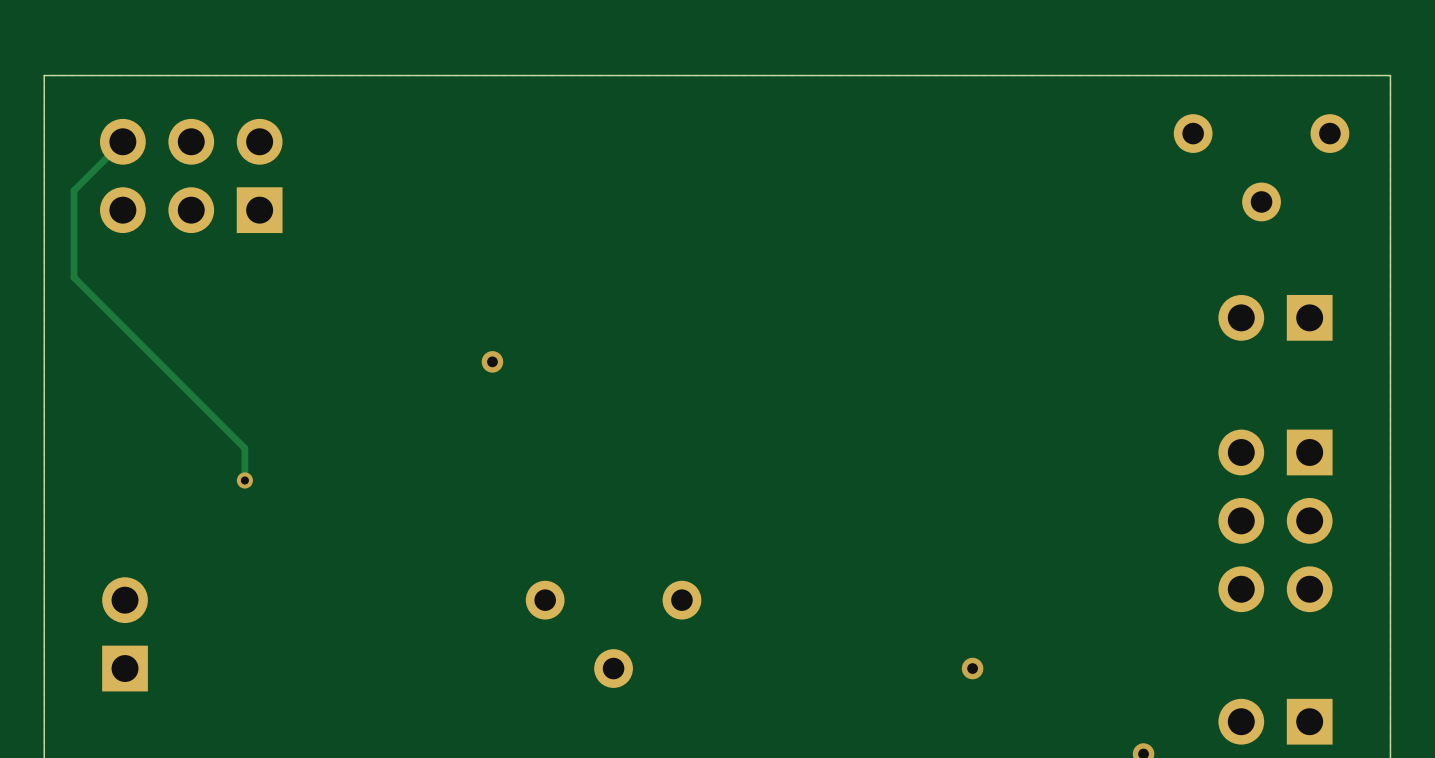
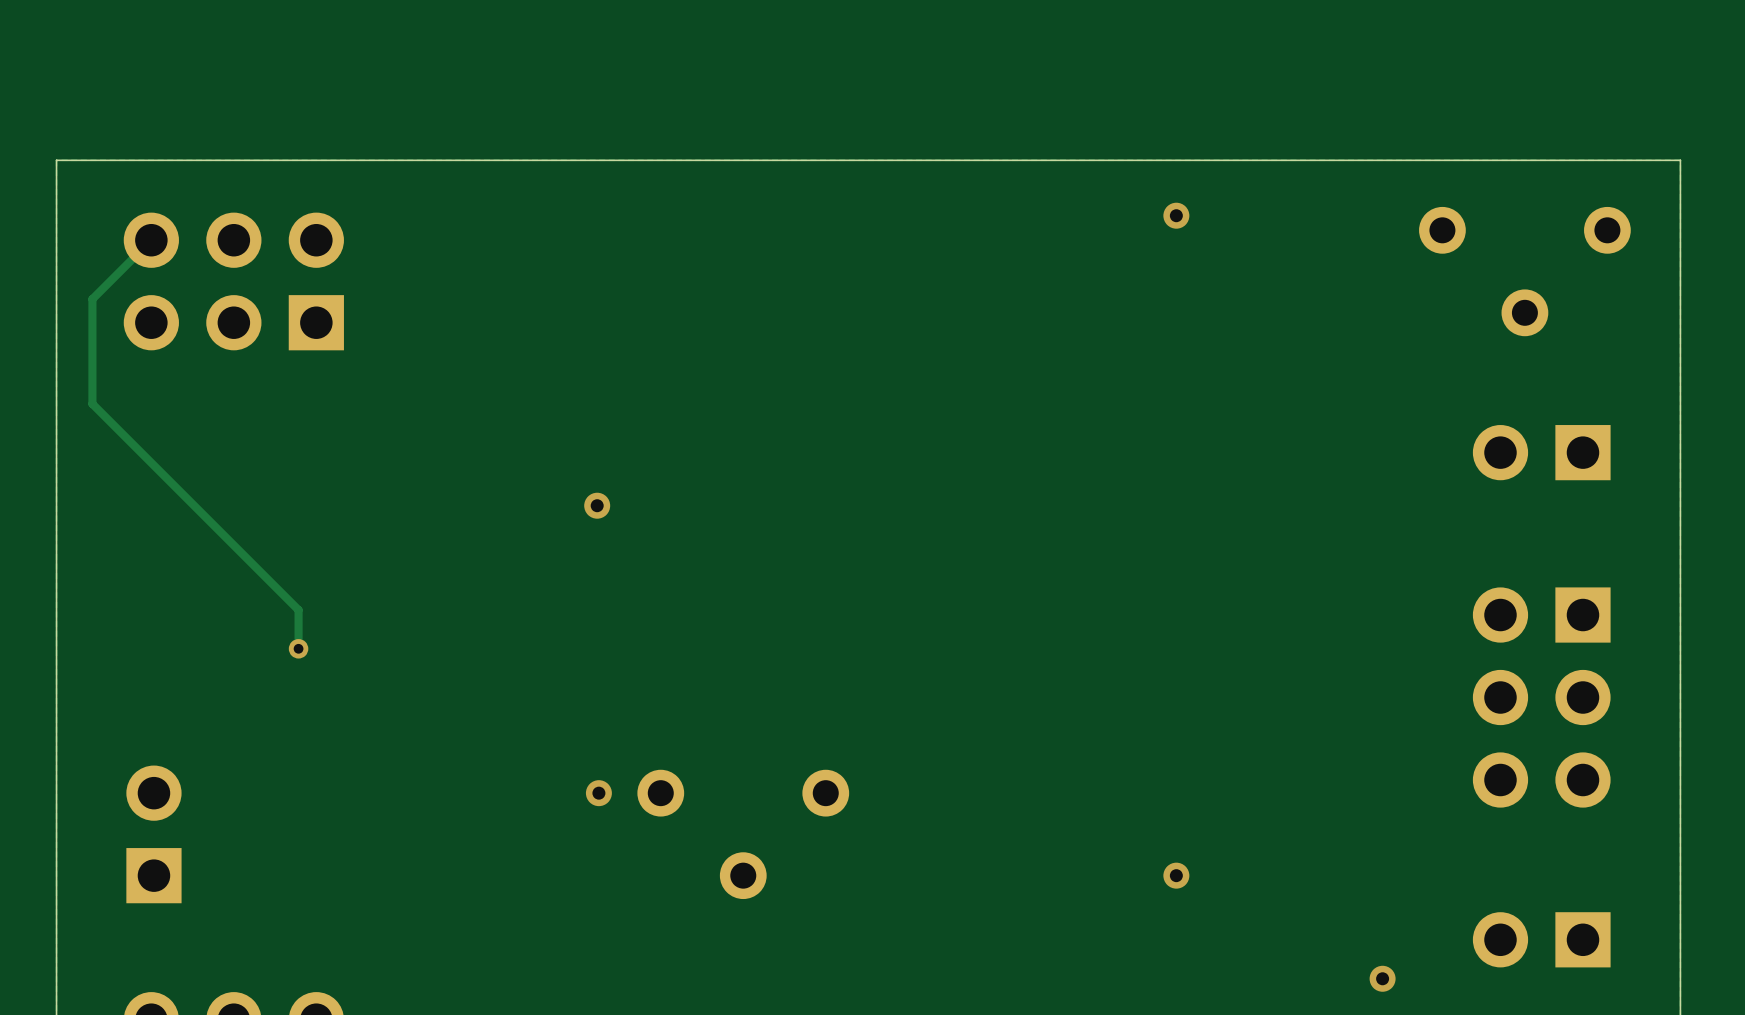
via: none -> (1176, 215)
via: none -> (598, 793)

